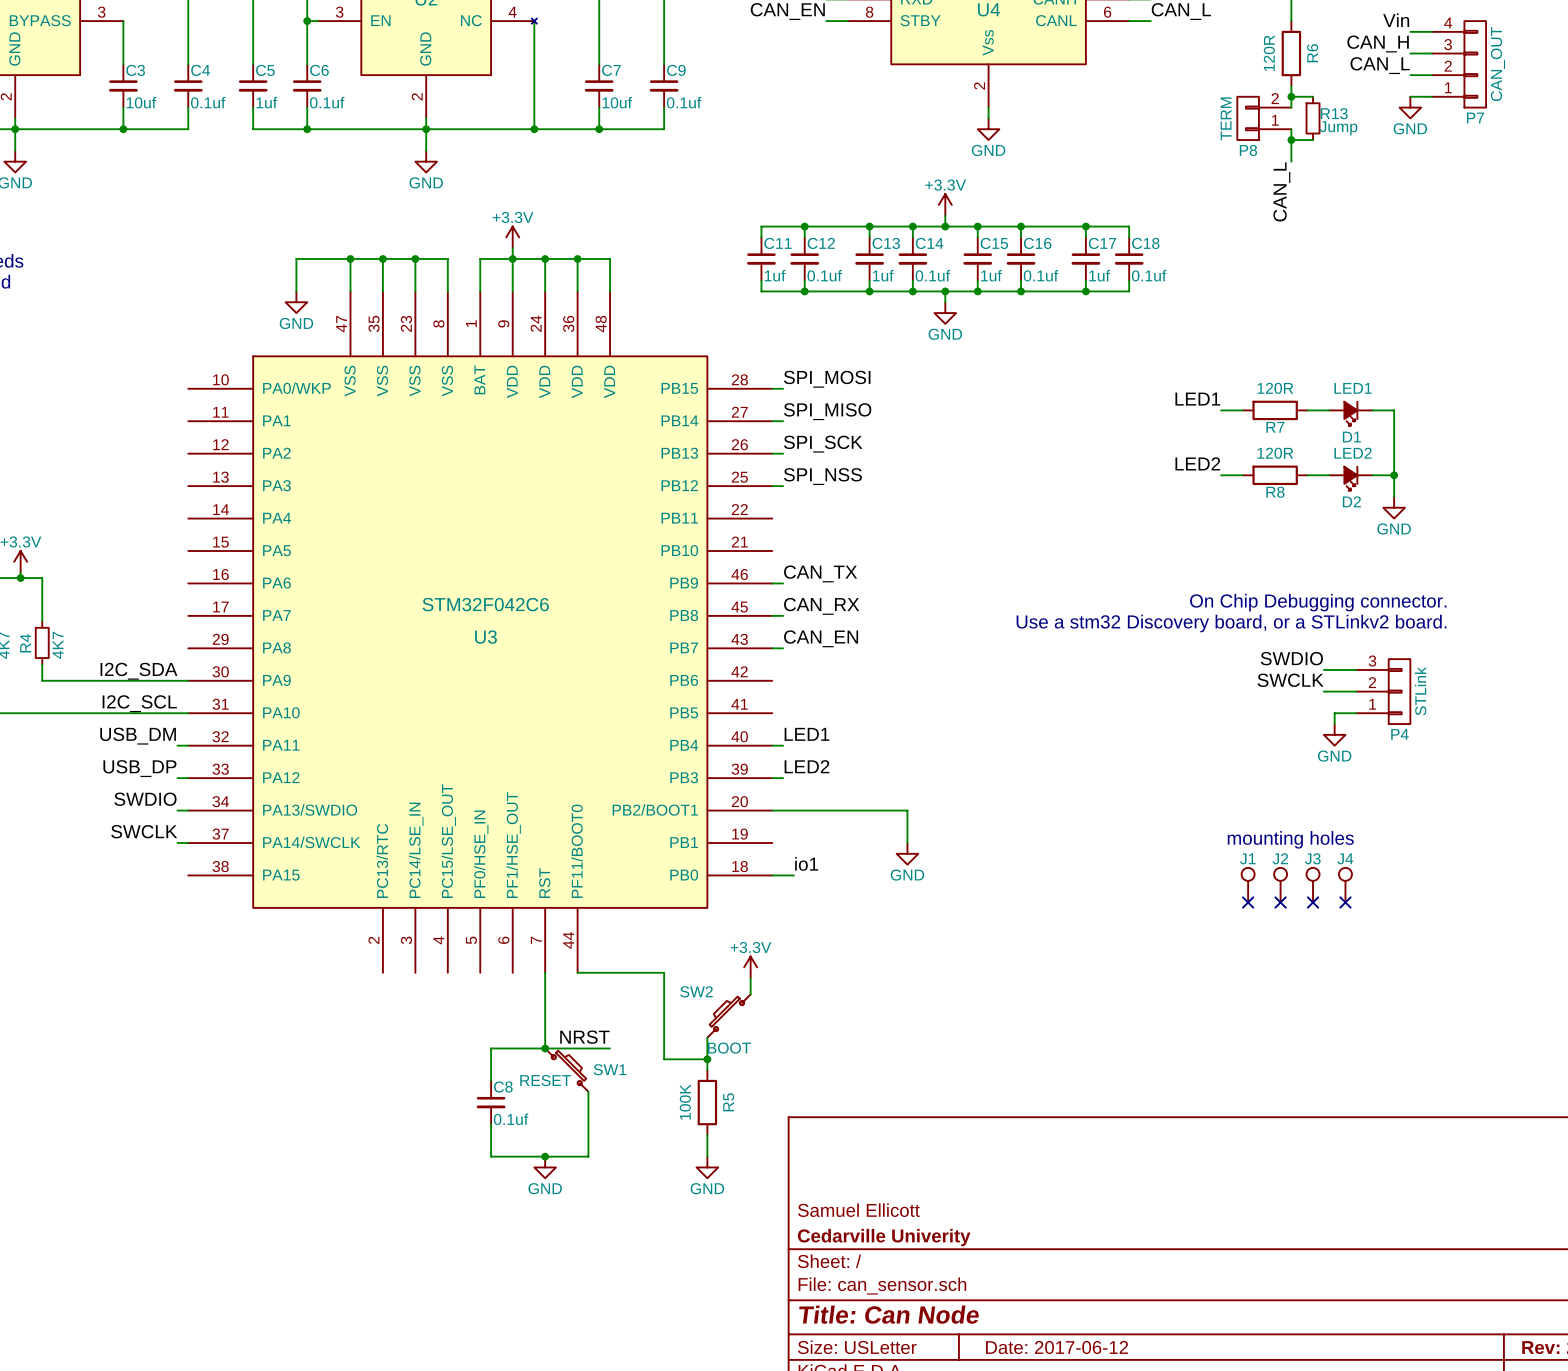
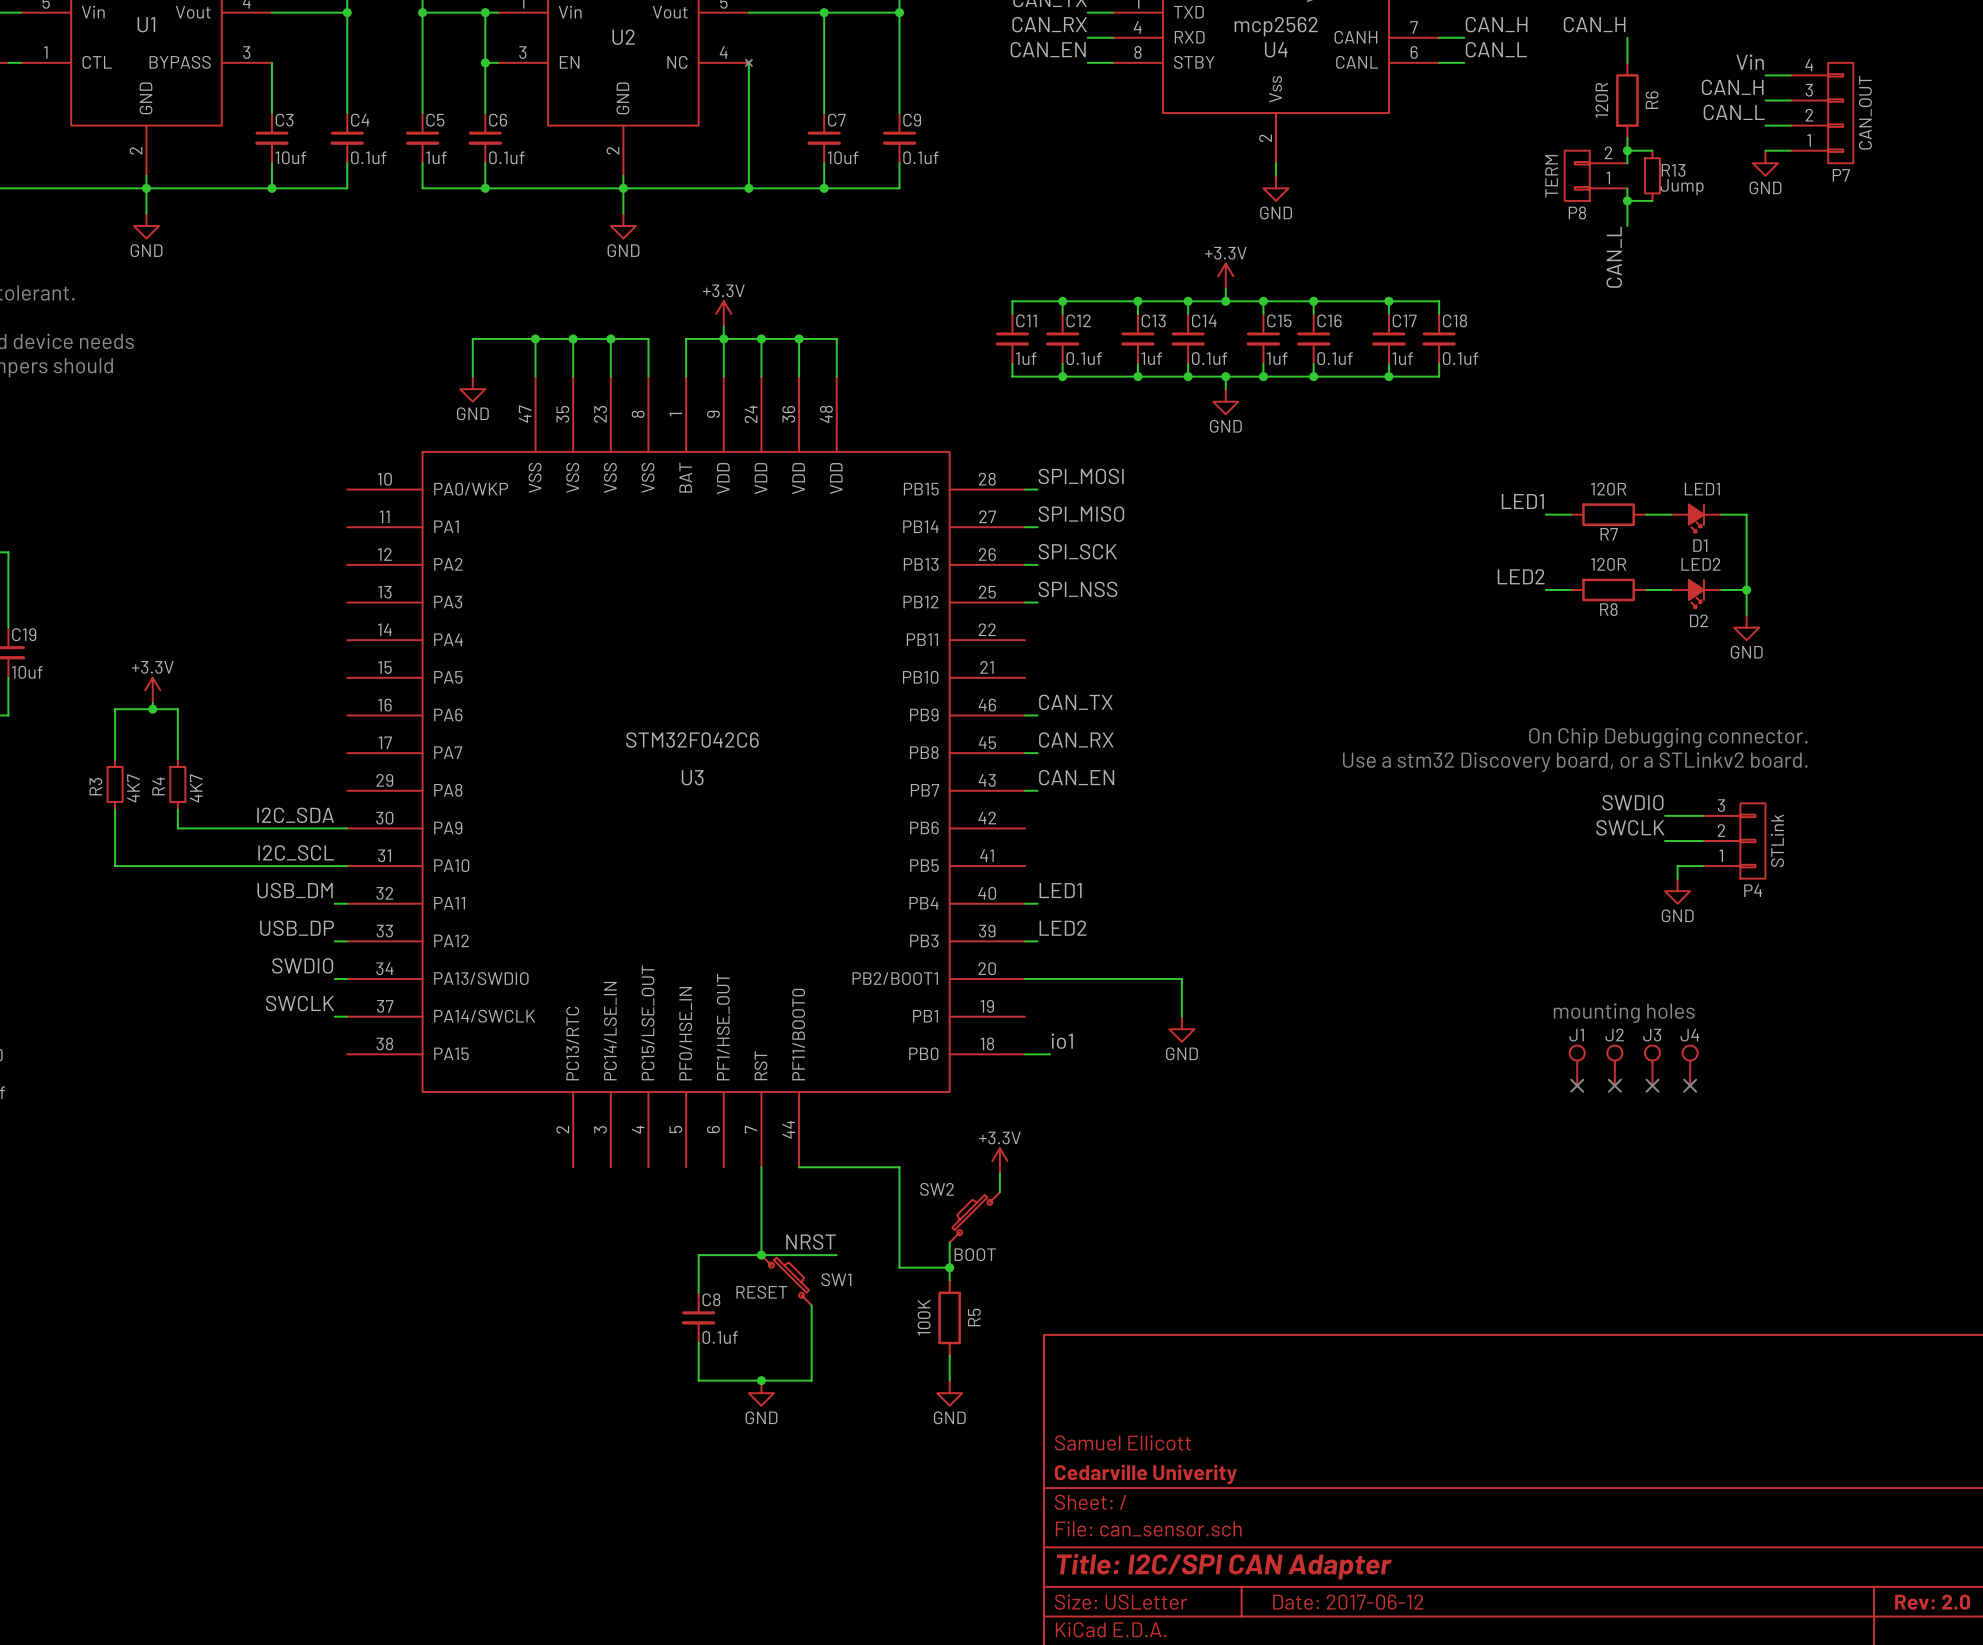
title block: Title: Can Node (889, 1314) -> Title: I2C/SPI CAN Adapter (1224, 1566)

